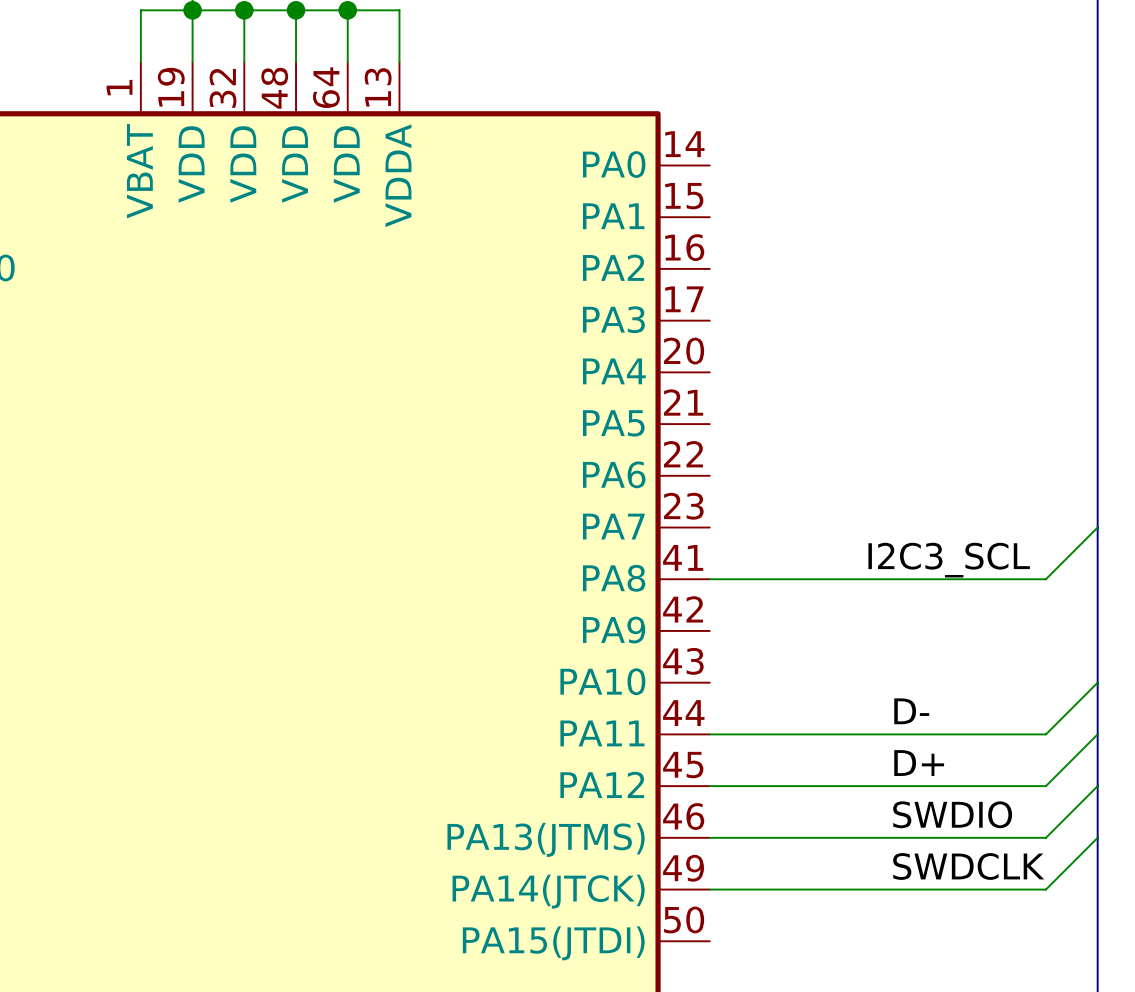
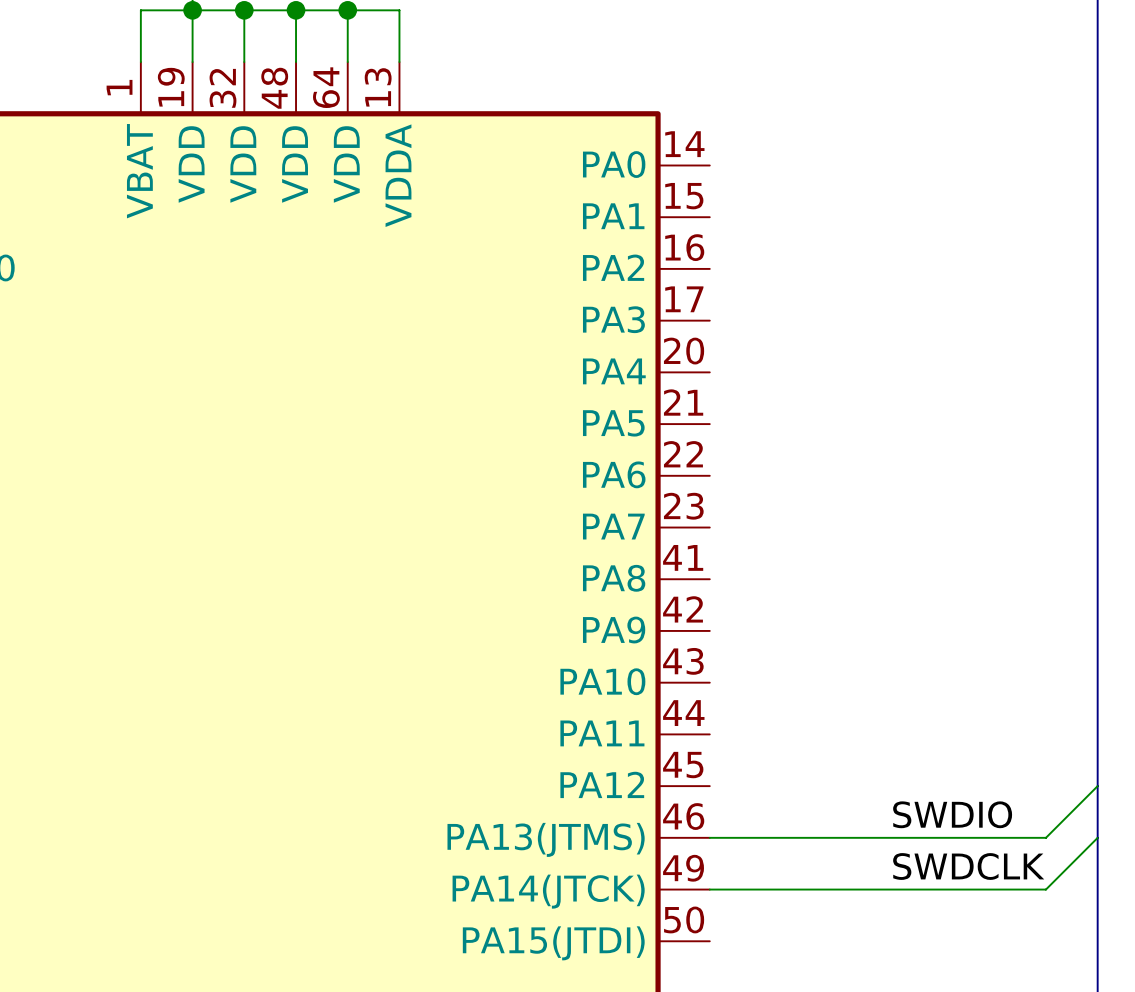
wire: (1097, 527) (1045, 579) (709, 579) -> none
label: I2C3_SCL (949, 560) -> none
wire: (1097, 682) (1045, 734) (709, 734) -> none
label: D- (911, 711) -> none
wire: (1097, 734) (1045, 786) (709, 786) -> none
label: D+ (919, 763) -> none

